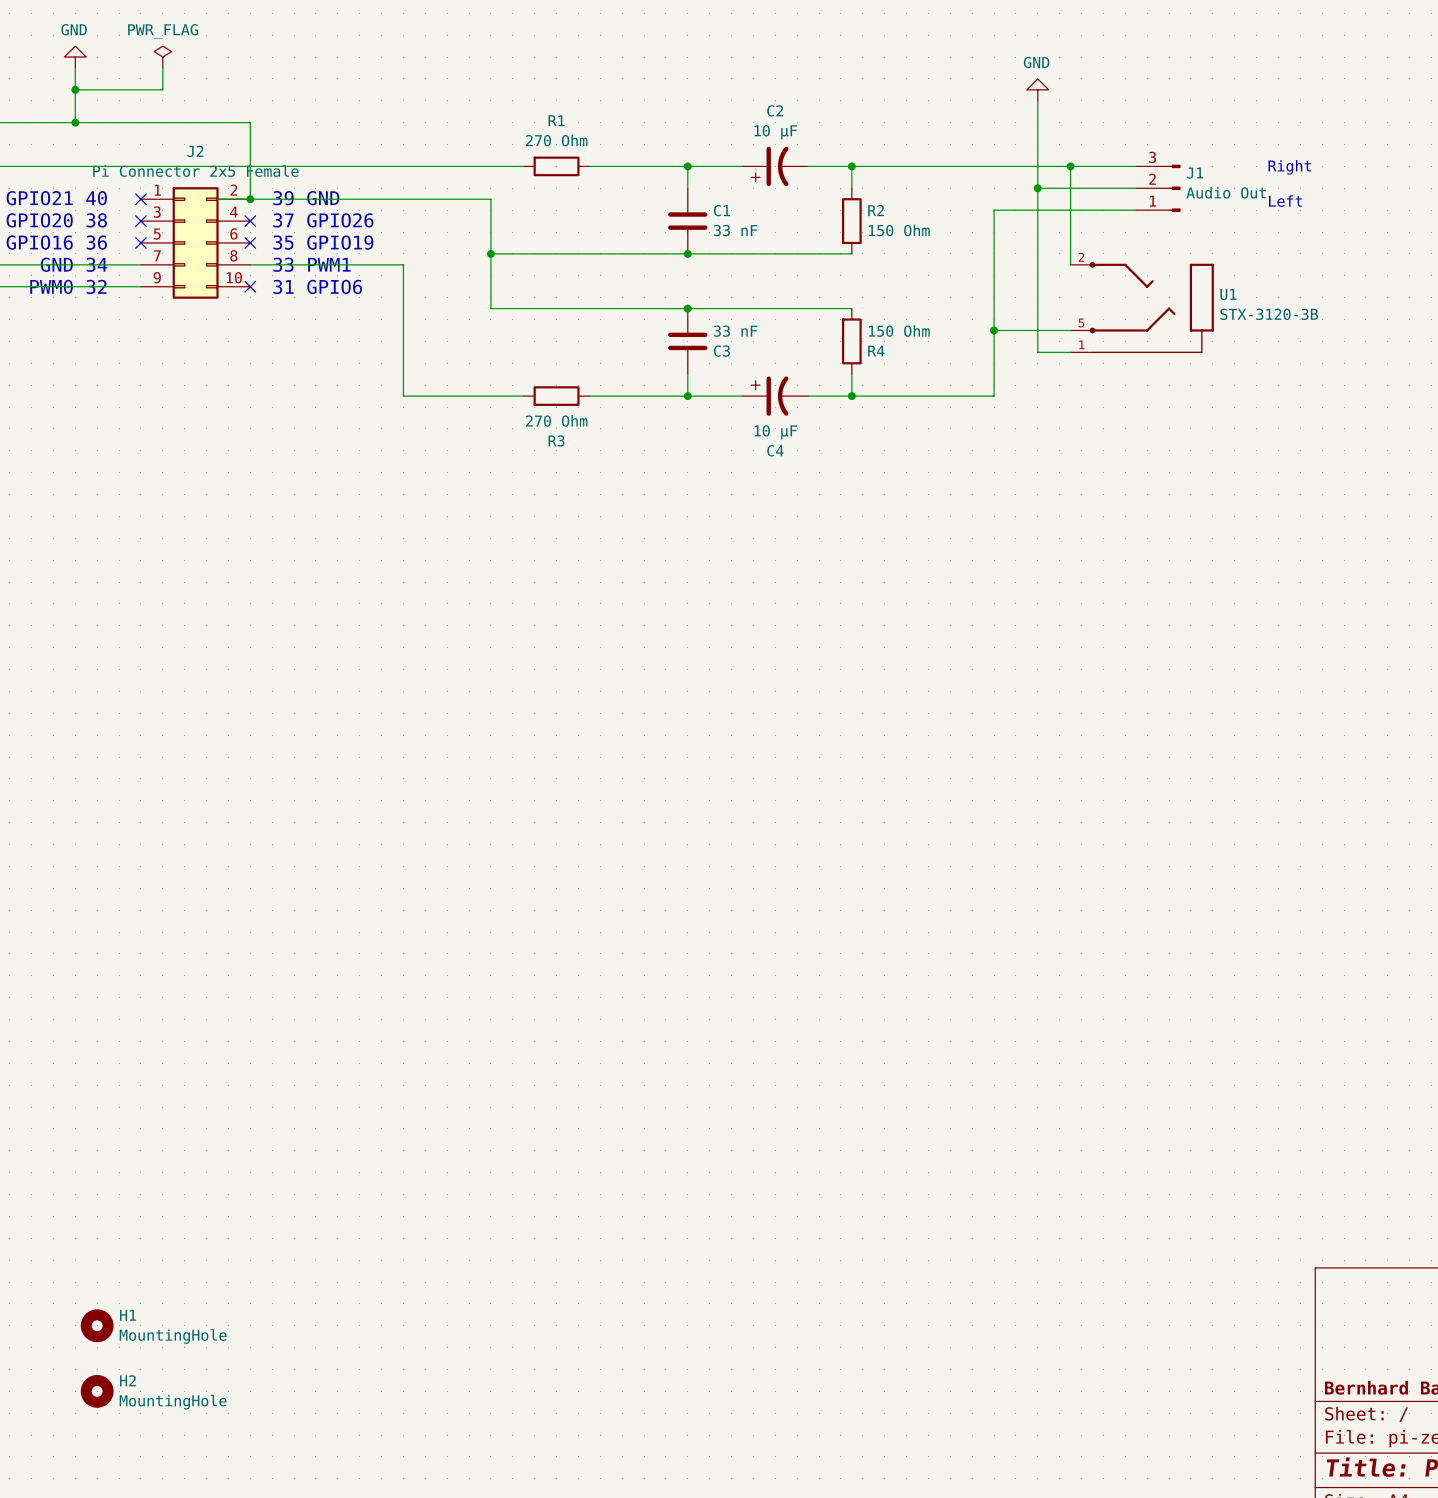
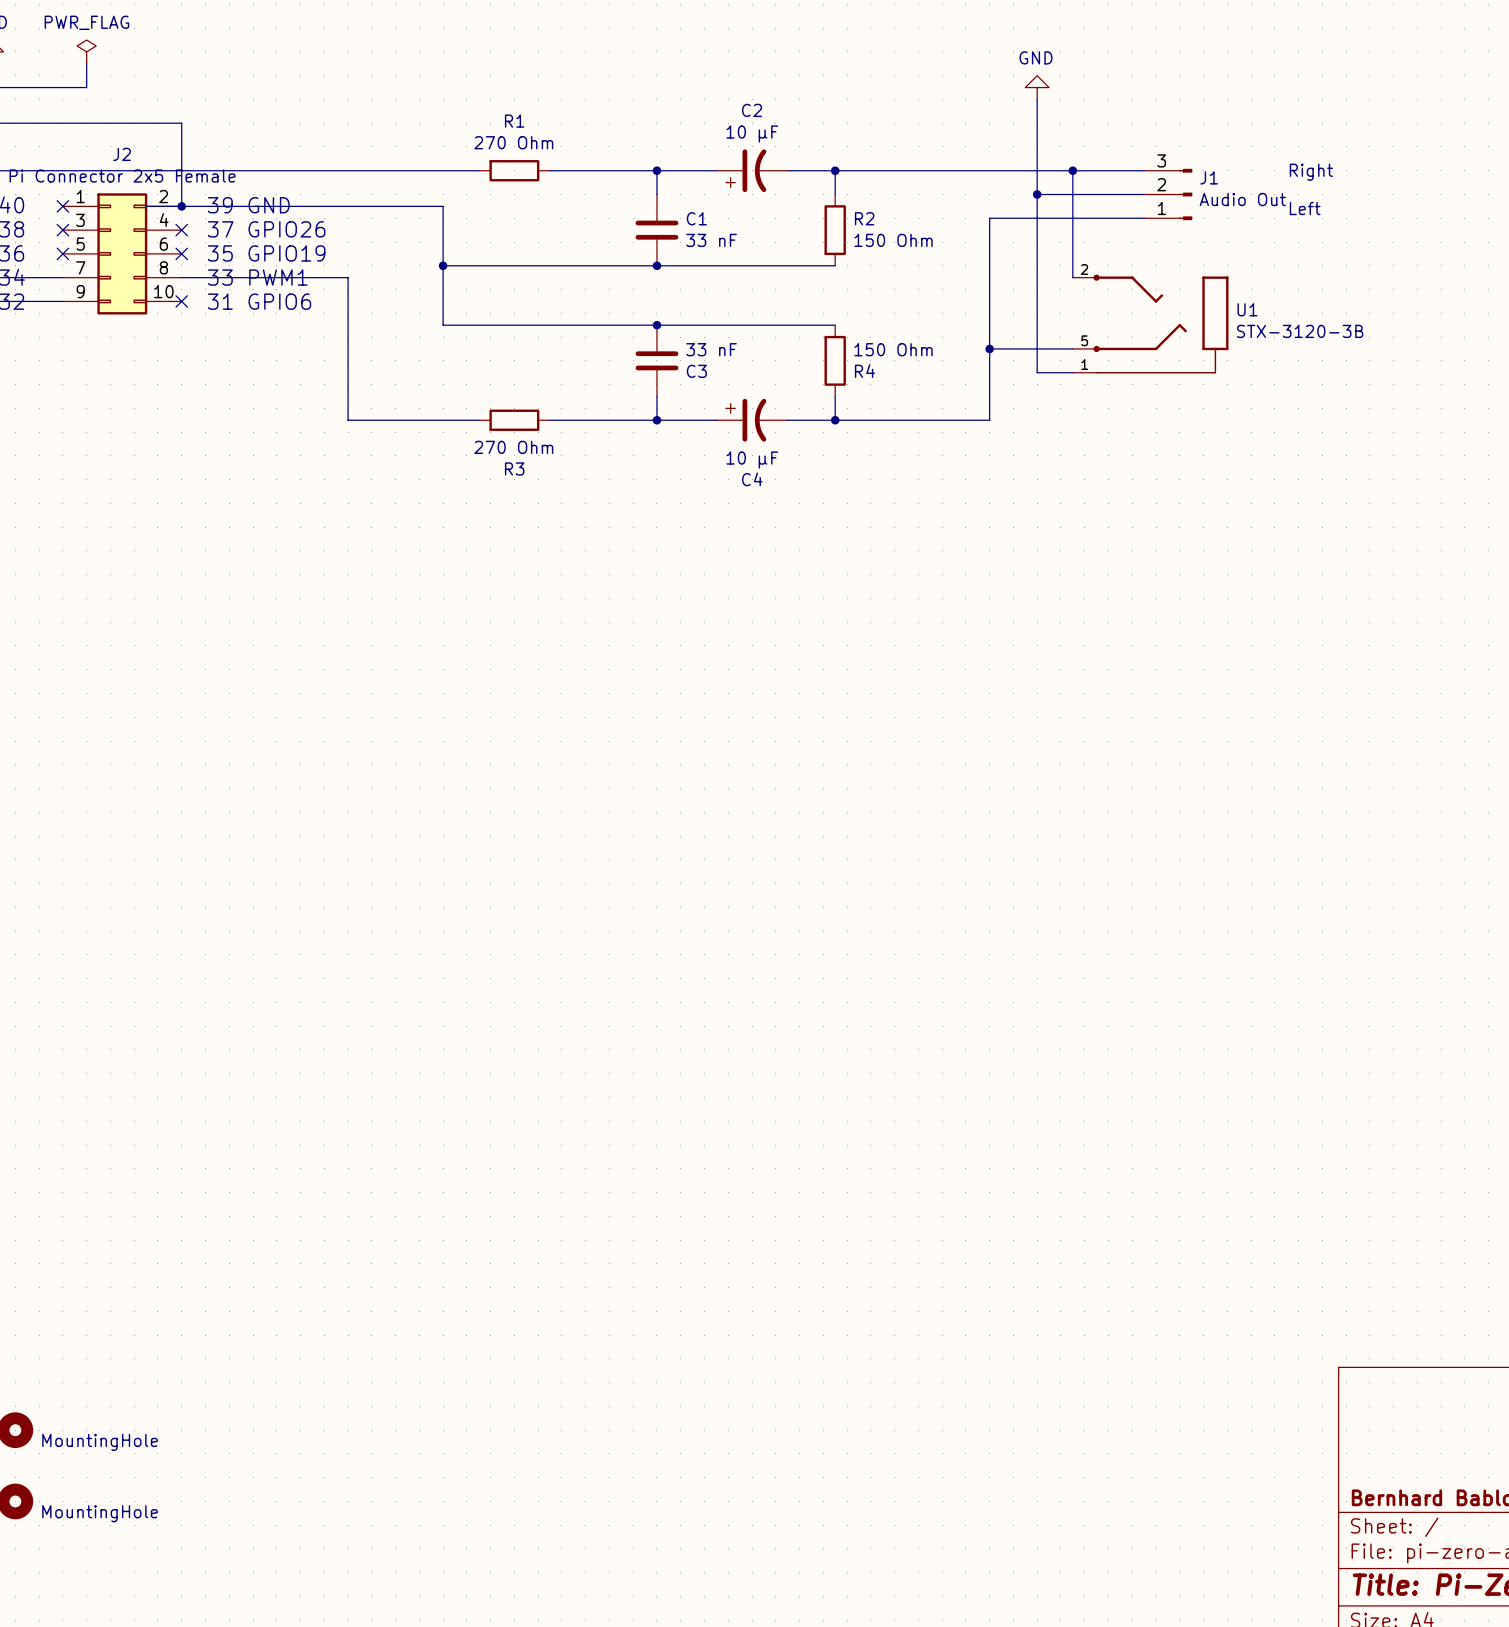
H1 name: H1 (128, 1315) -> none
H2 name: H2 (127, 1380) -> none

